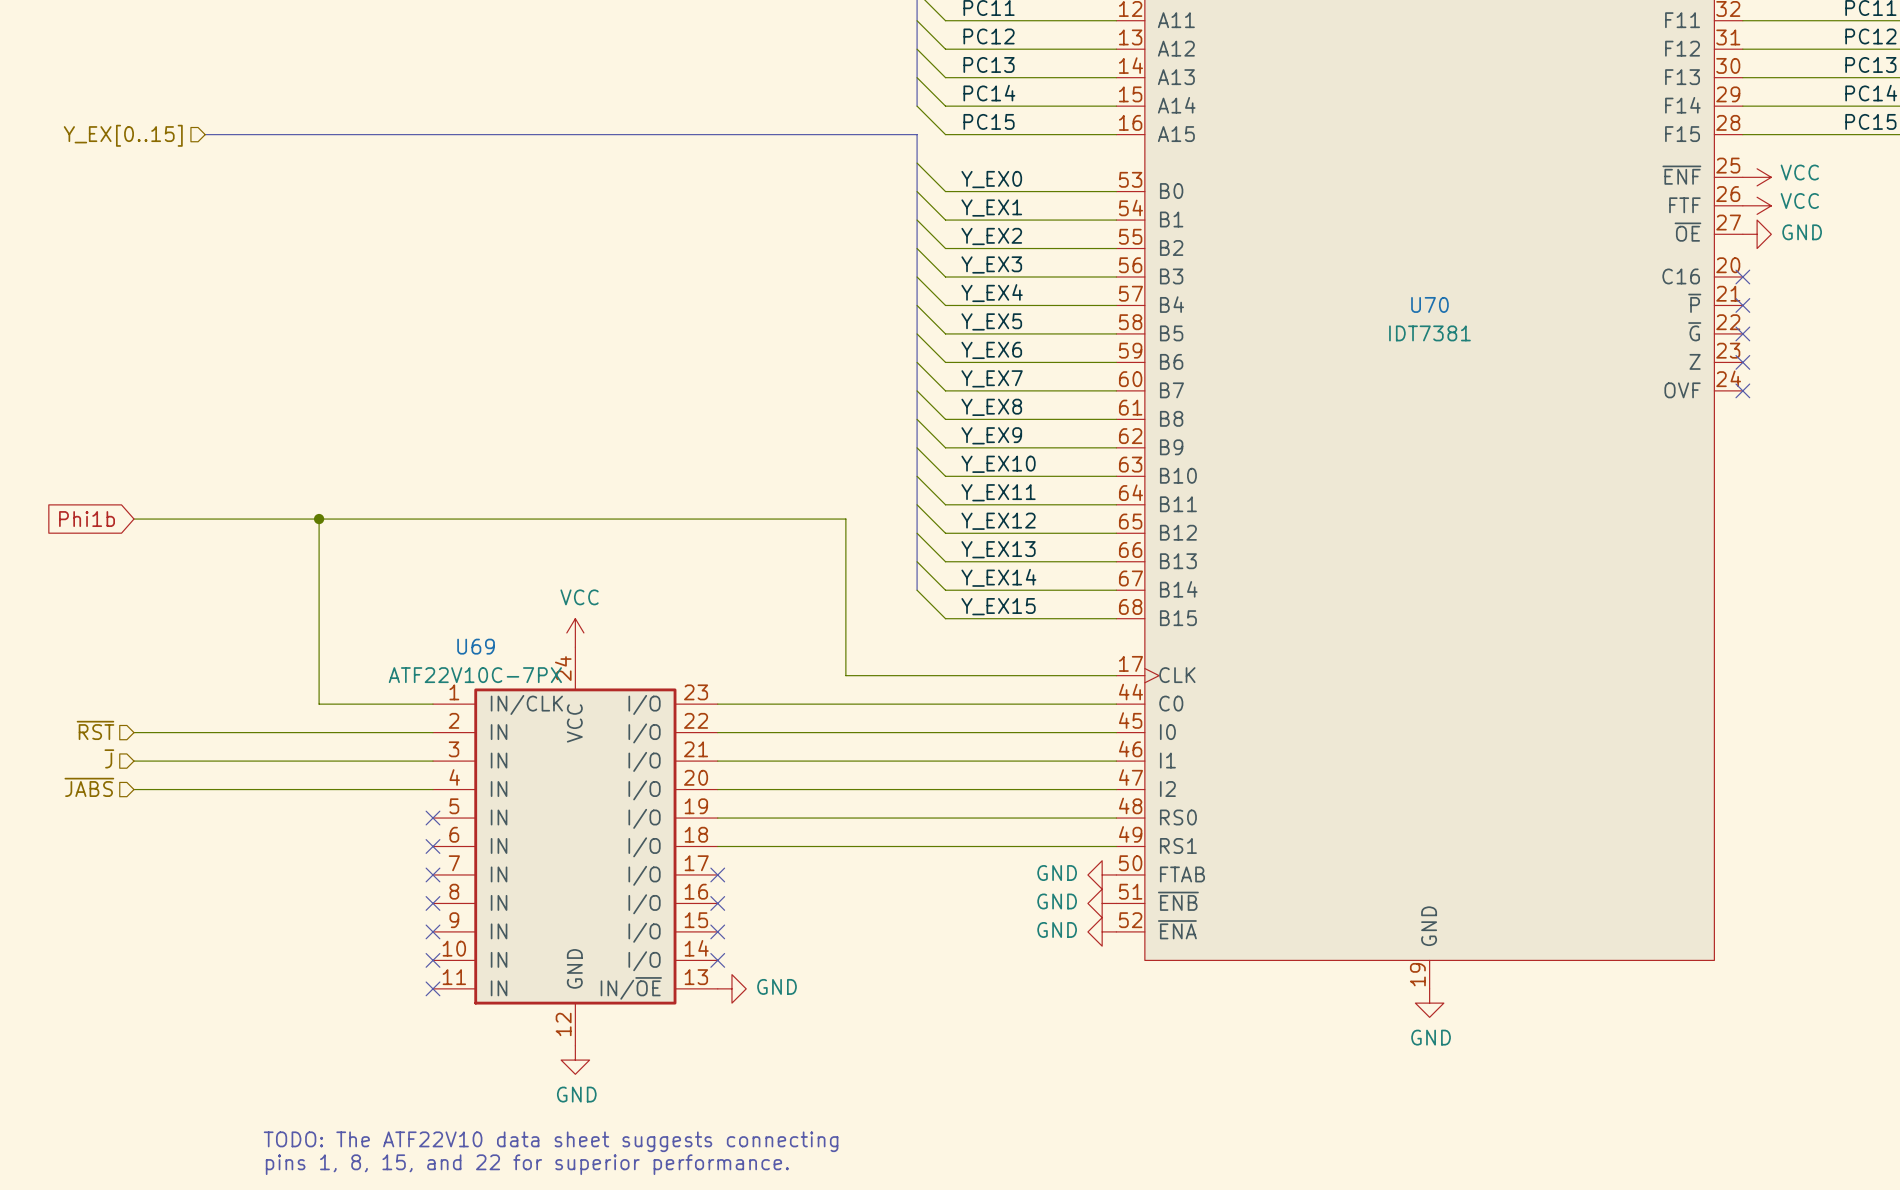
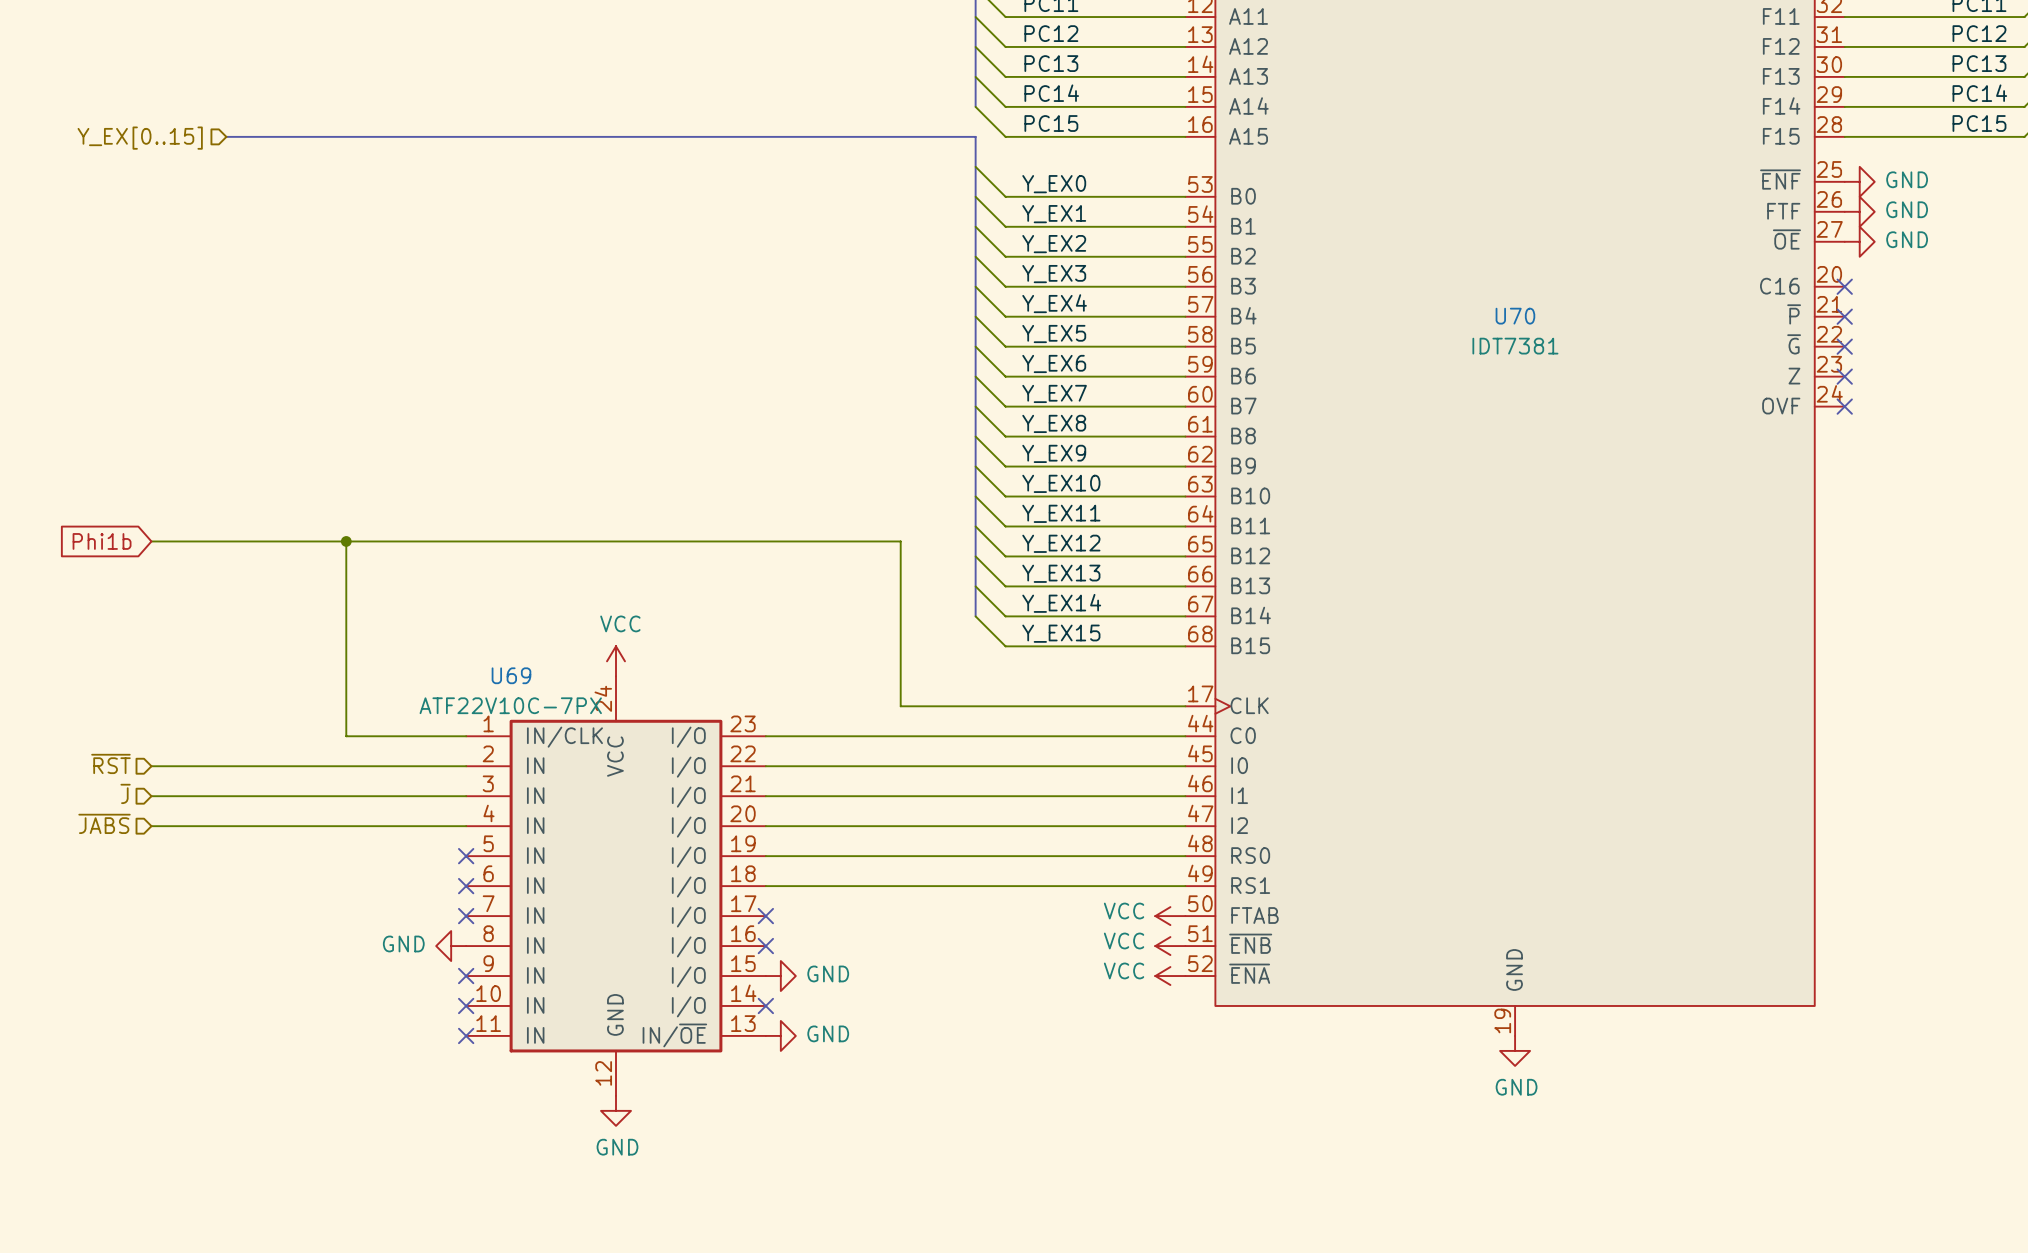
power symbol: VCC (1757, 177) -> GND (1859, 181)
power symbol: VCC (1757, 205) -> GND (1859, 211)
power symbol: GND (1102, 874) -> VCC (1170, 916)
power symbol: none -> GND (451, 946)
no-connect mark: (432, 903) -> none
power symbol: GND (1102, 903) -> VCC (1170, 946)
no-connect mark: (717, 931) -> none
power symbol: none -> GND (780, 976)
power symbol: GND (1102, 931) -> VCC (1170, 976)
text: TODO: The ATF22V10 data sheet suggests connecting (551, 1141) -> none
text: pins 1, 8, 15, and 22 for superior performance. (527, 1164) -> none

